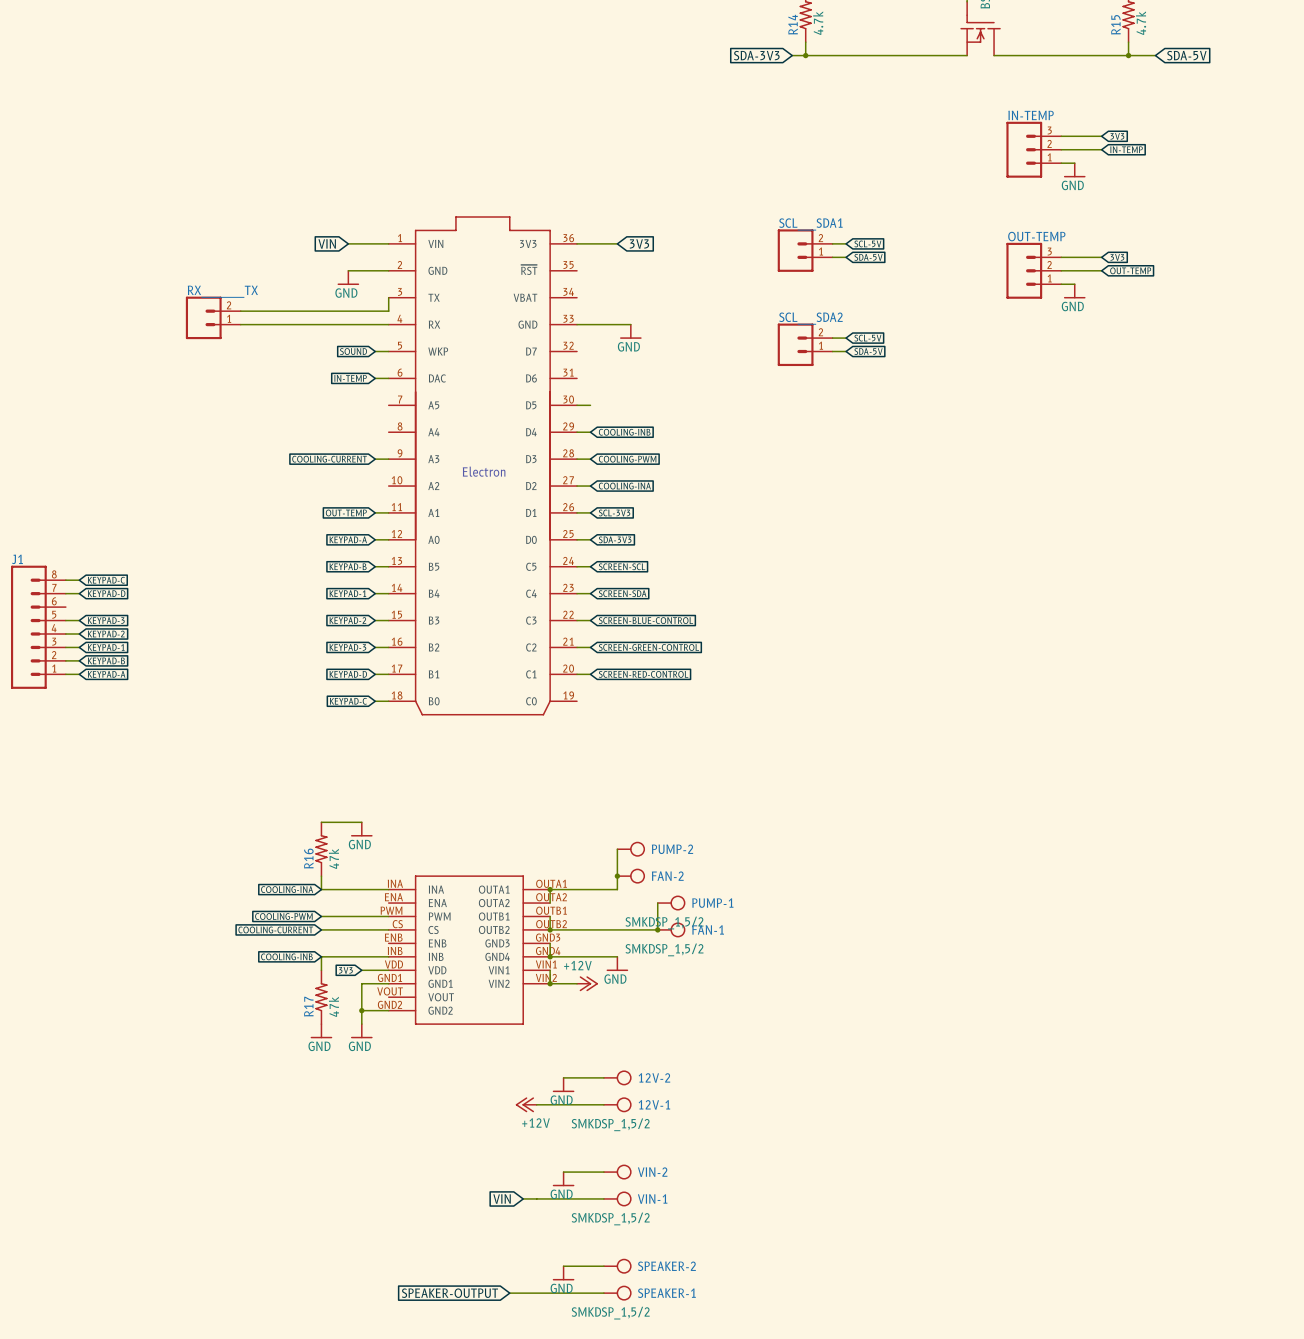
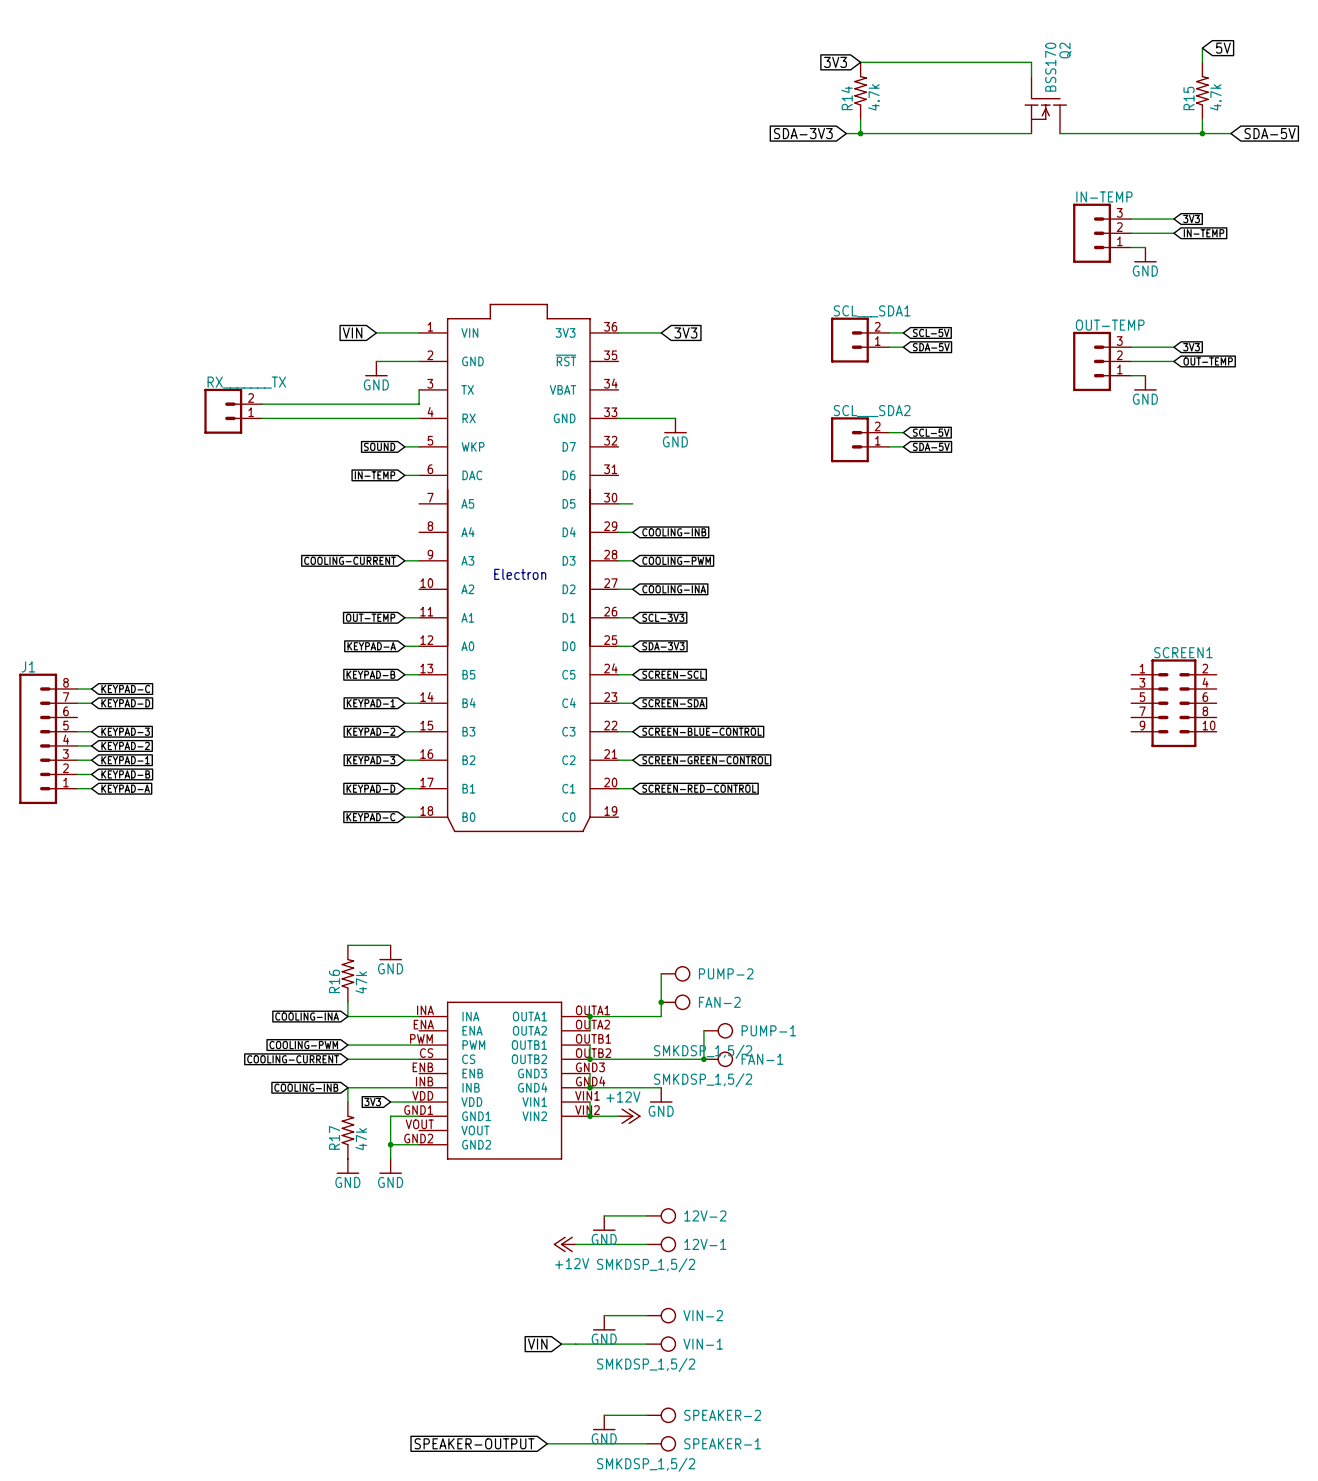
SCREEN1: none -> (1173, 703)

